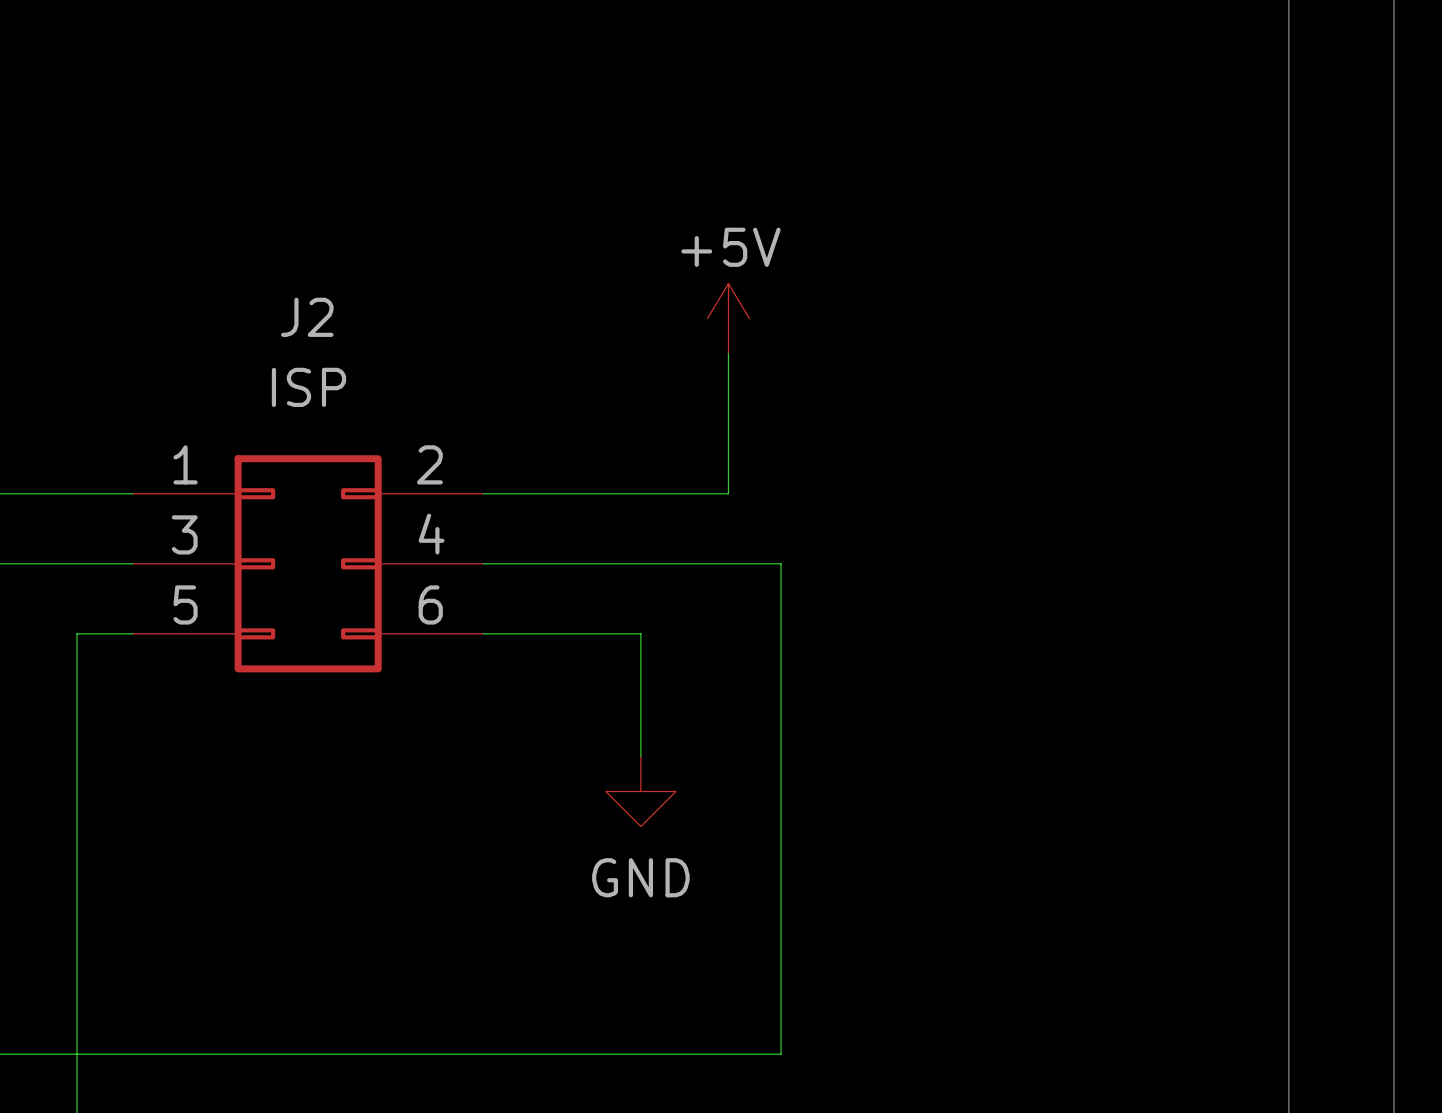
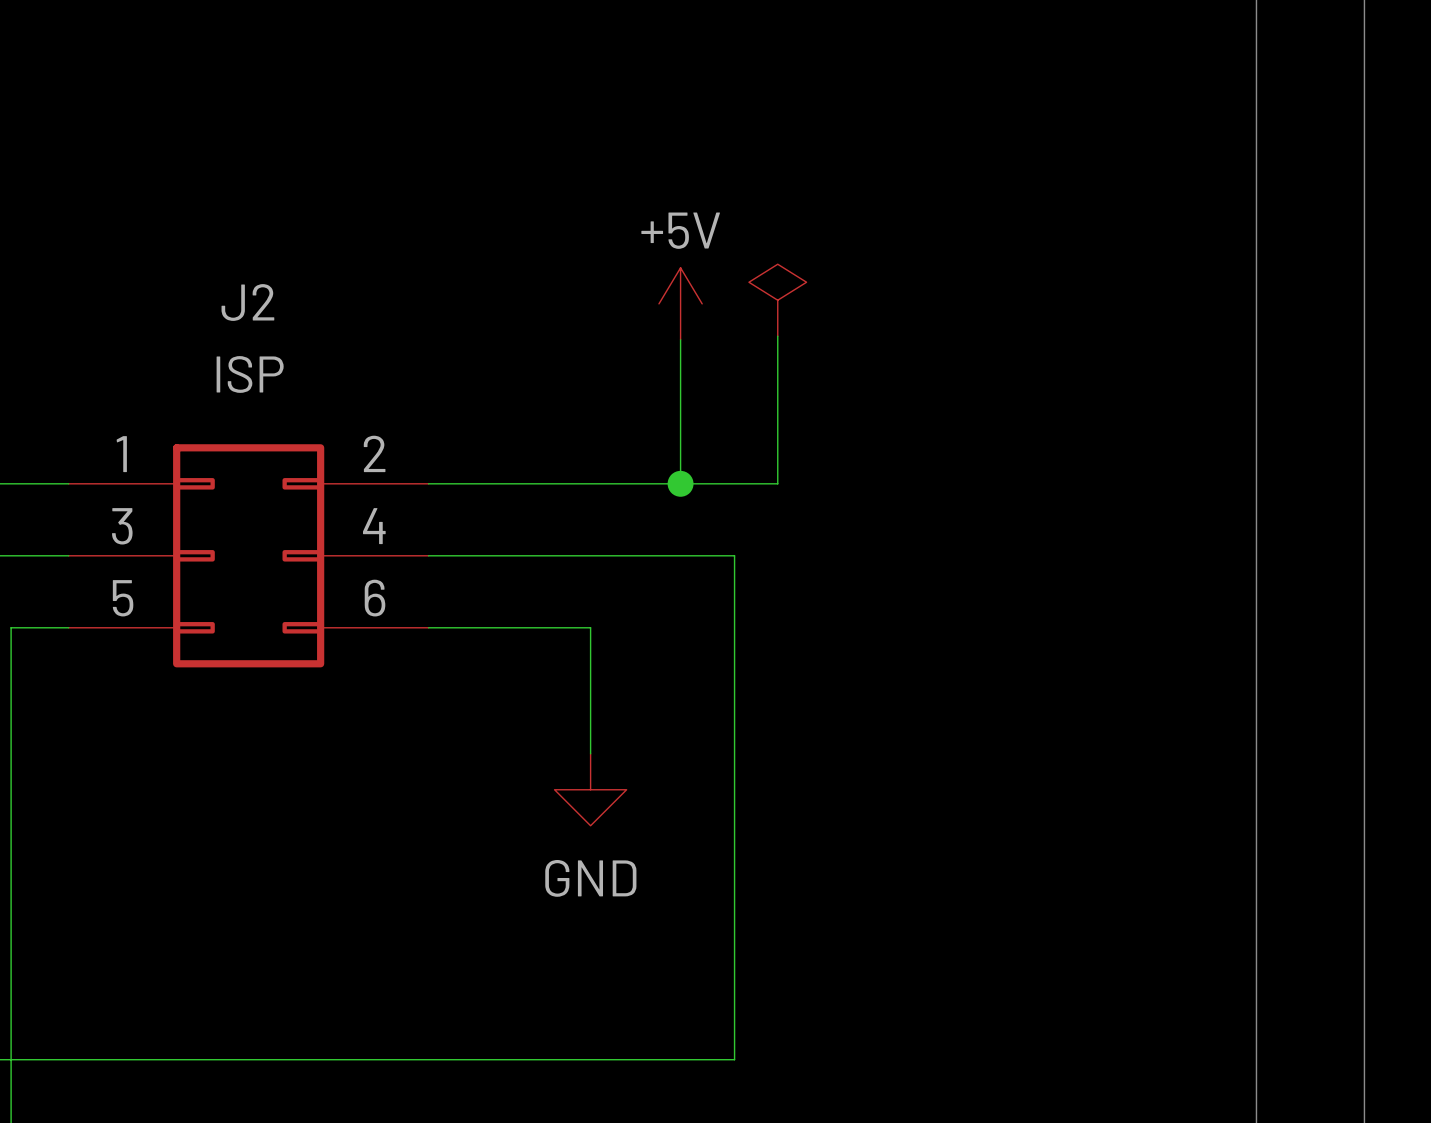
power symbol: none -> (777, 300)
wire: none -> (777, 336) (777, 483) (680, 483)
junction: none -> (680, 483)

